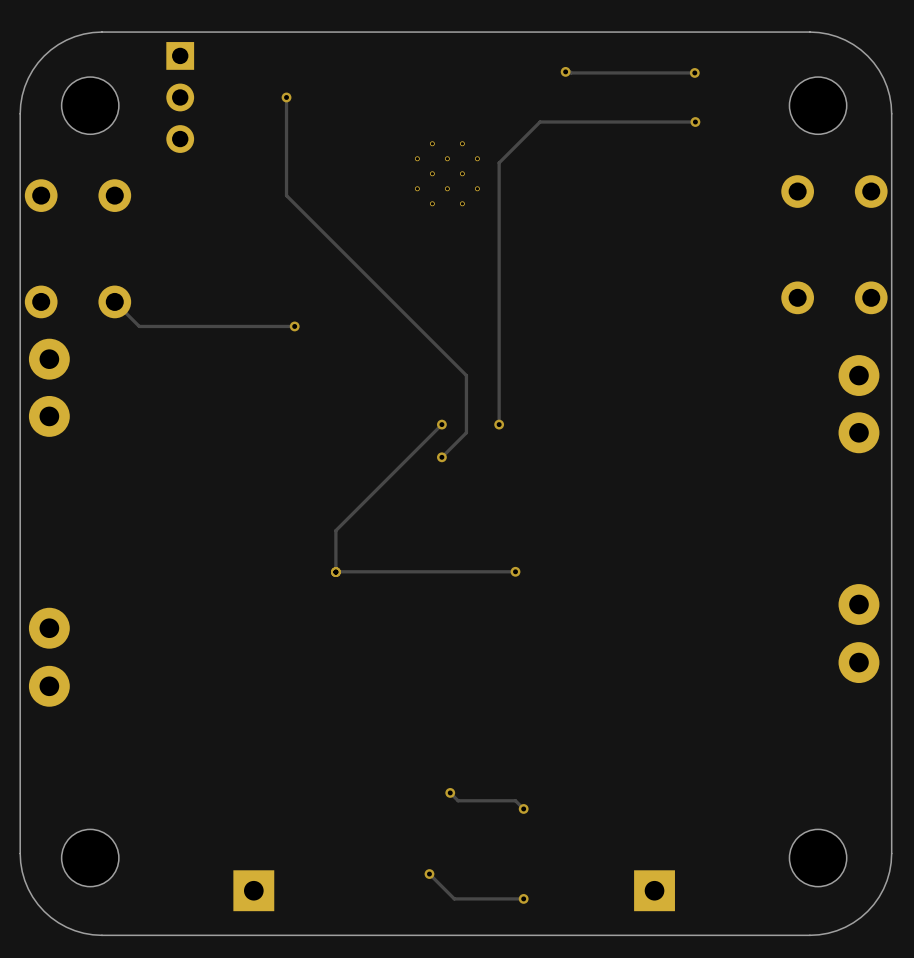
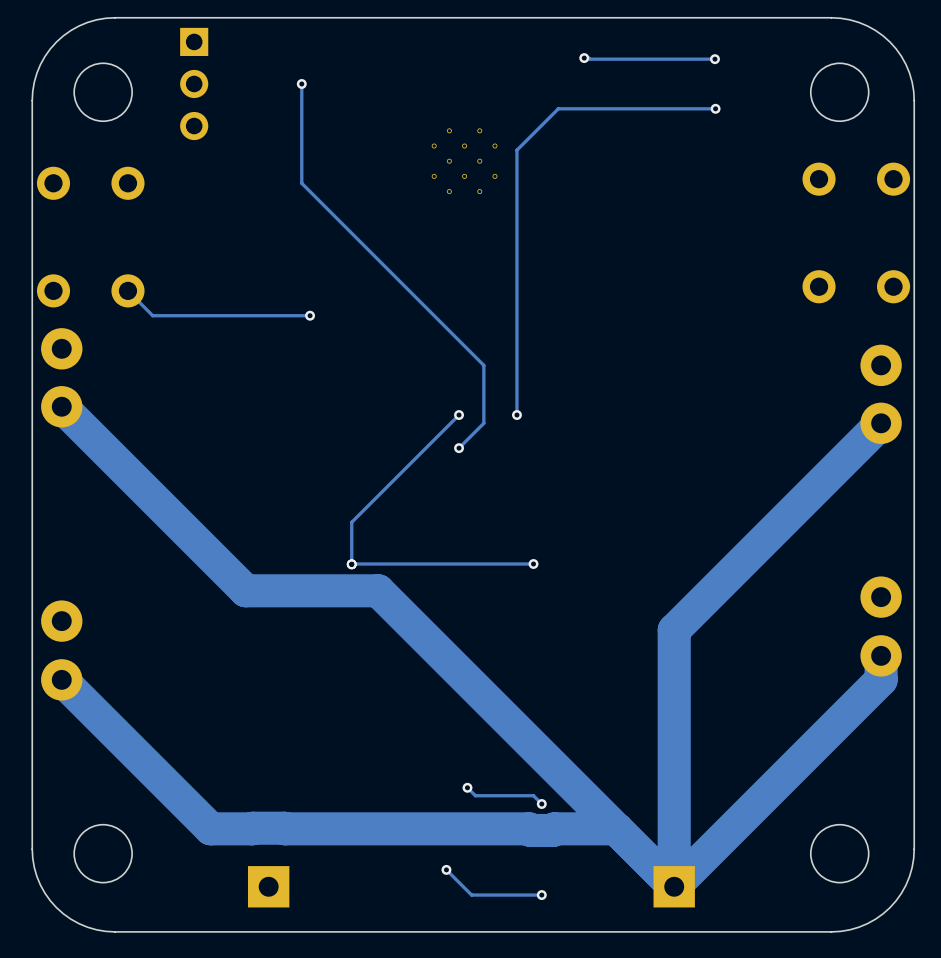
track: none -> (61, 406) (245, 590) (378, 590) (674, 886)
track: none -> (881, 423) (674, 630) (674, 886)
track: none -> (881, 655) (881, 679) (674, 886)
track: none -> (61, 679) (210, 828) (529, 828) (530, 830) (616, 828)

